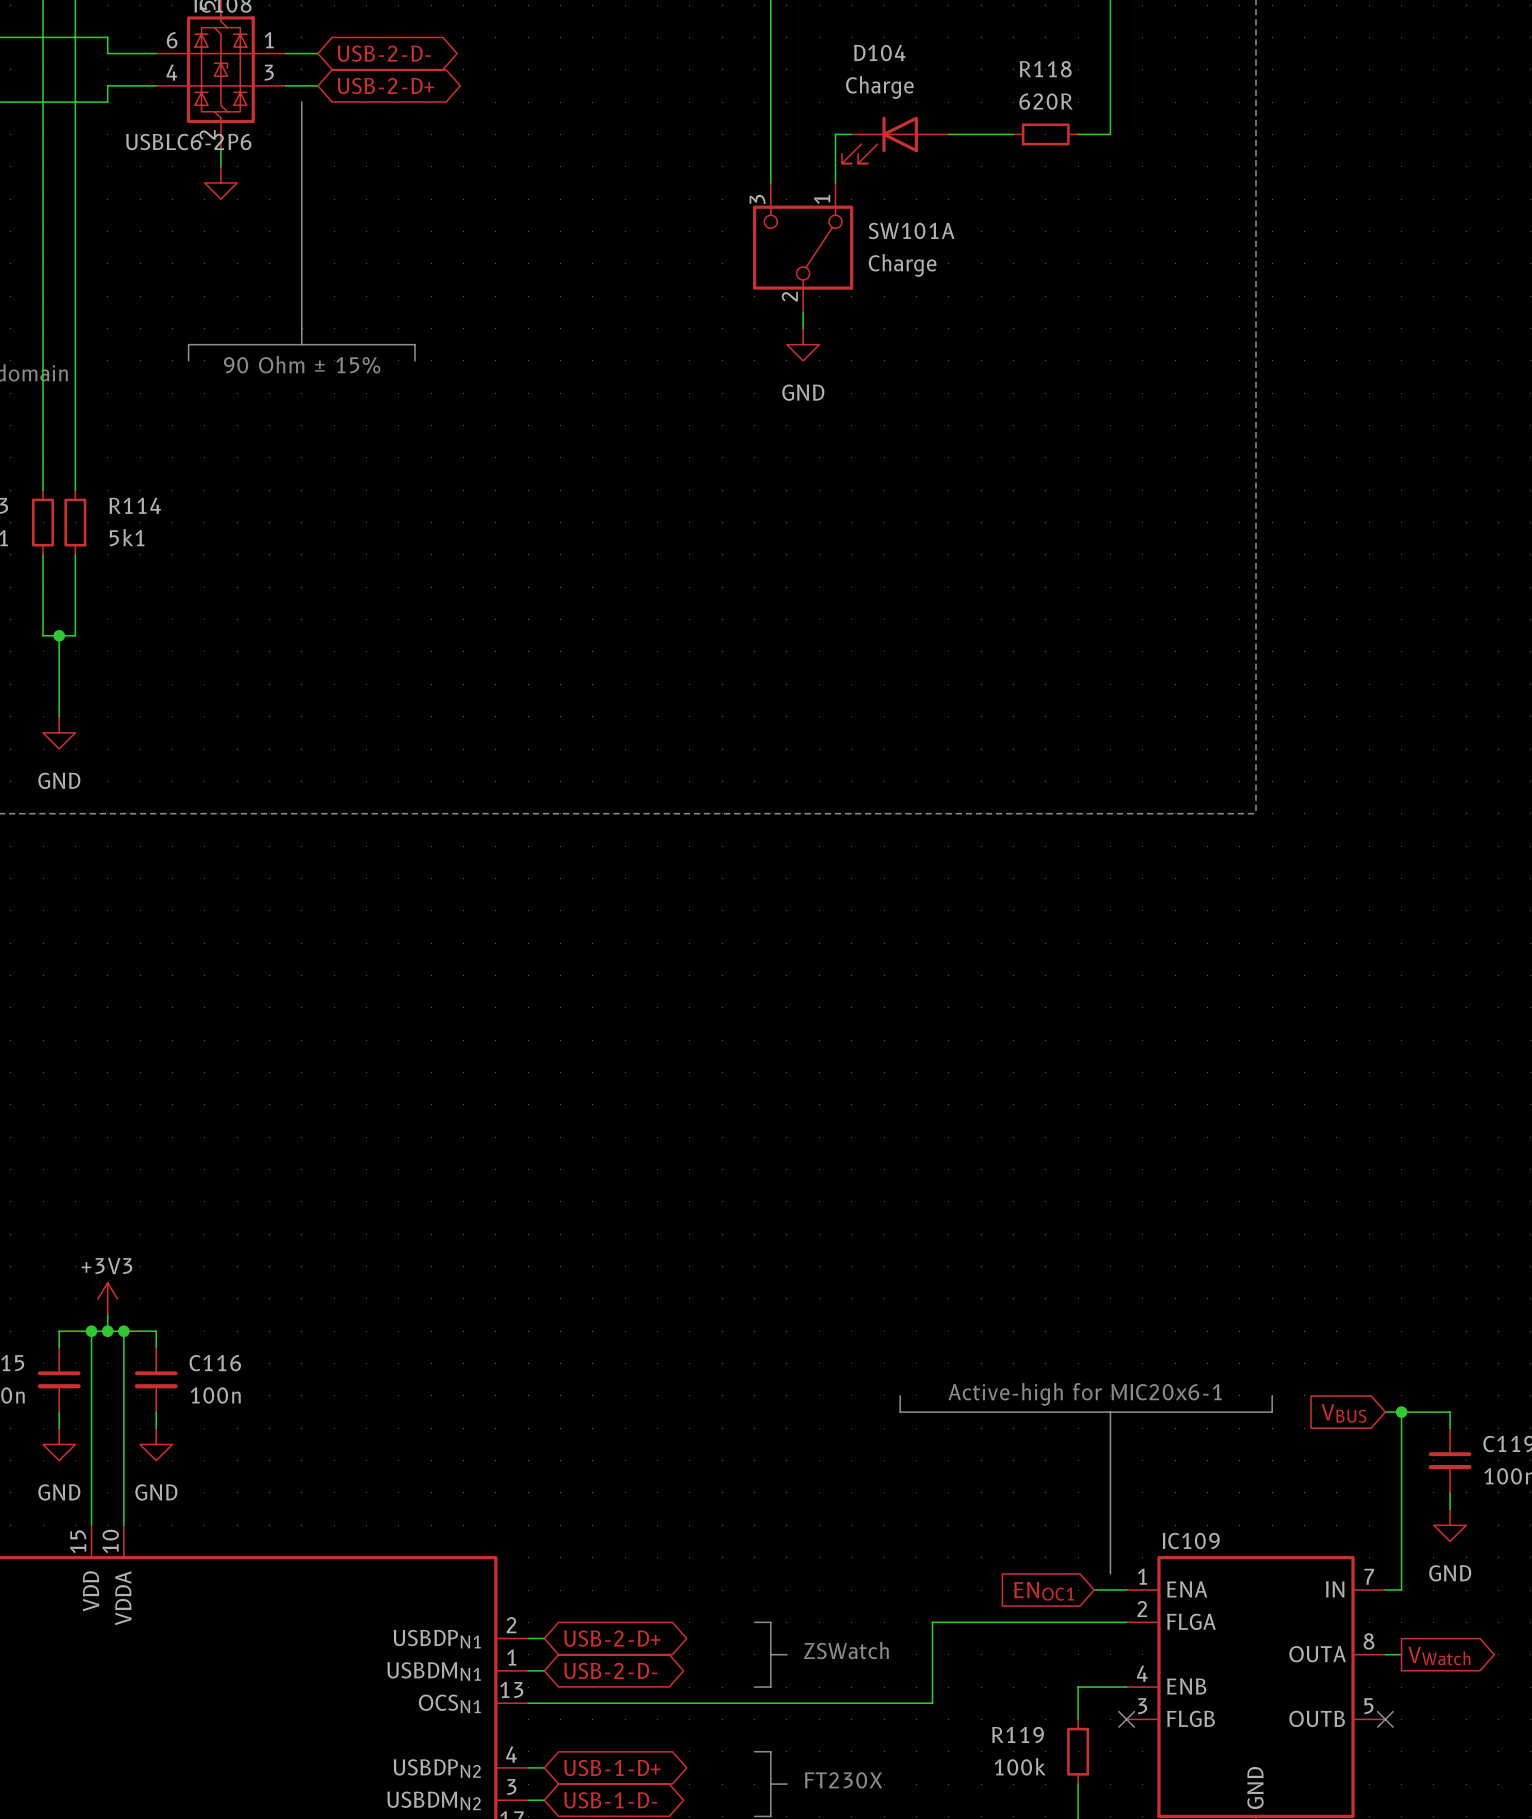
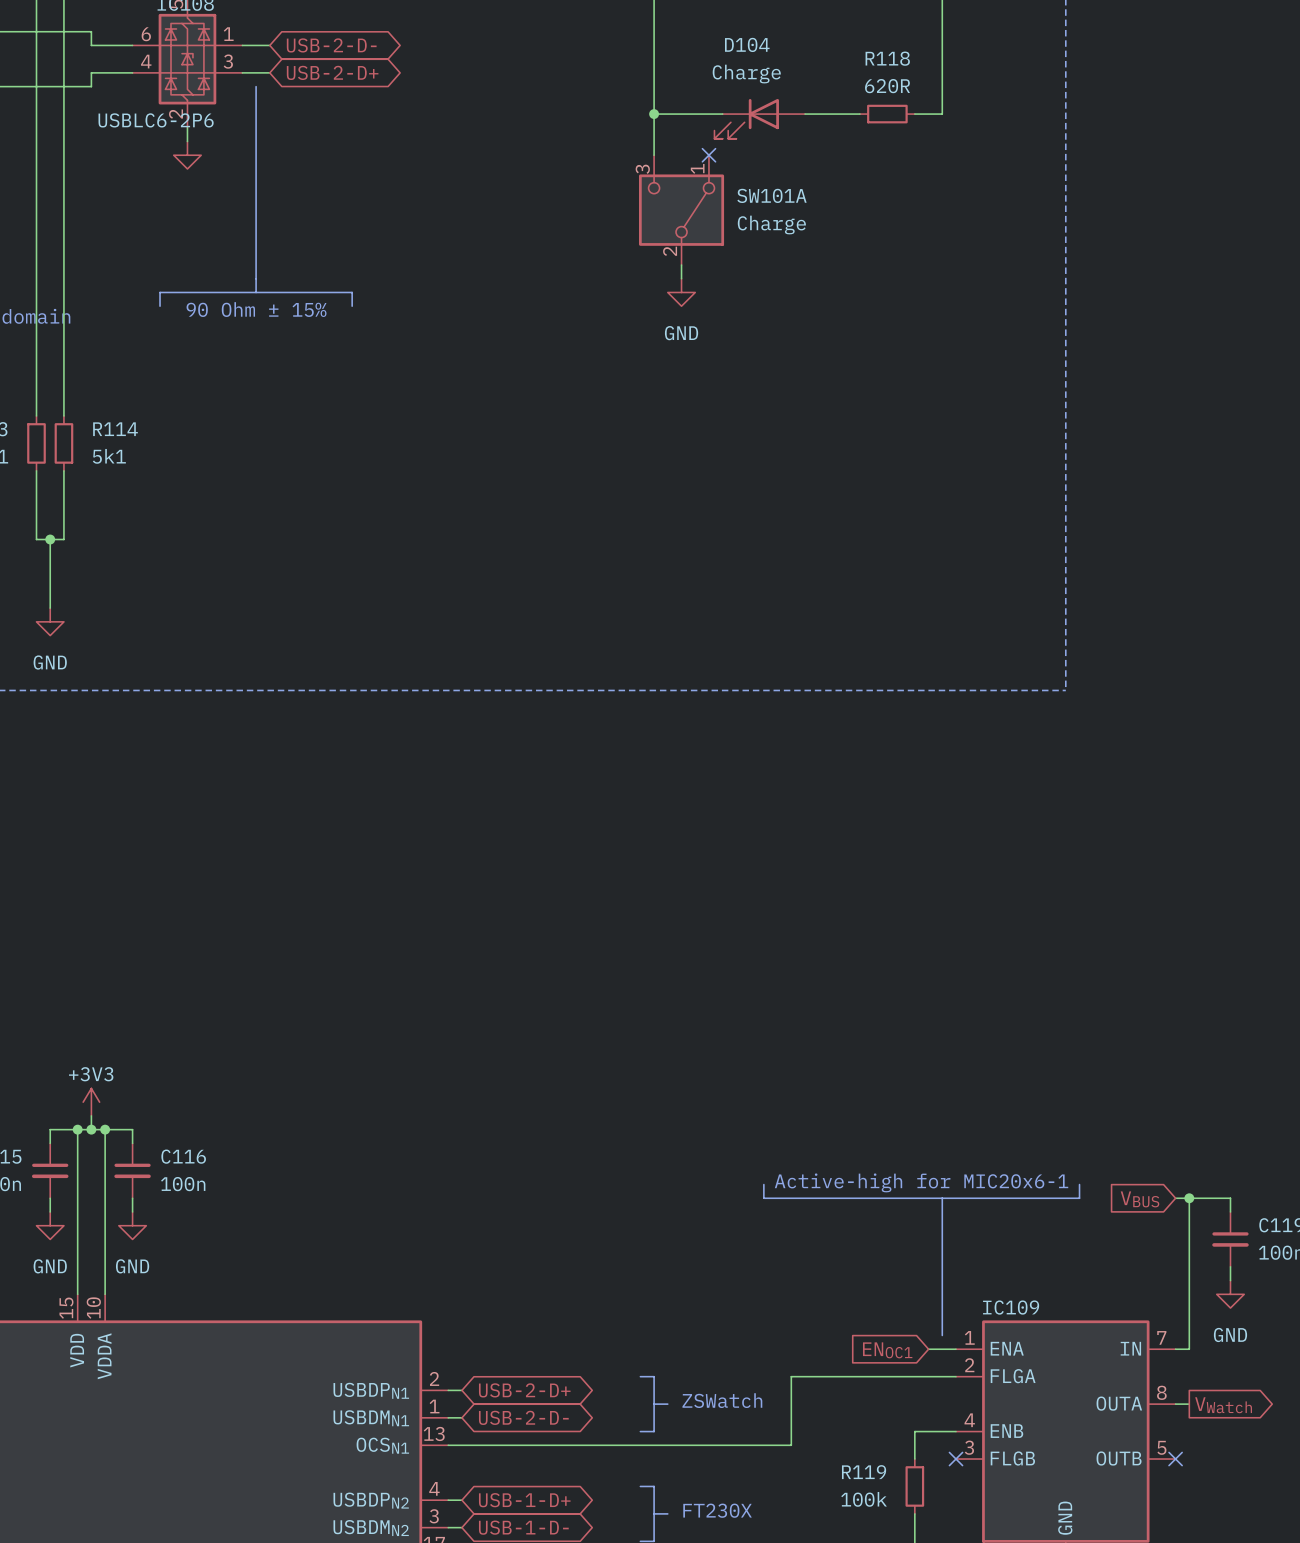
junction: none -> (654, 114)
wire: (835, 134) (835, 182) -> (708, 114) (654, 114)
no-connect mark: none -> (708, 155)

